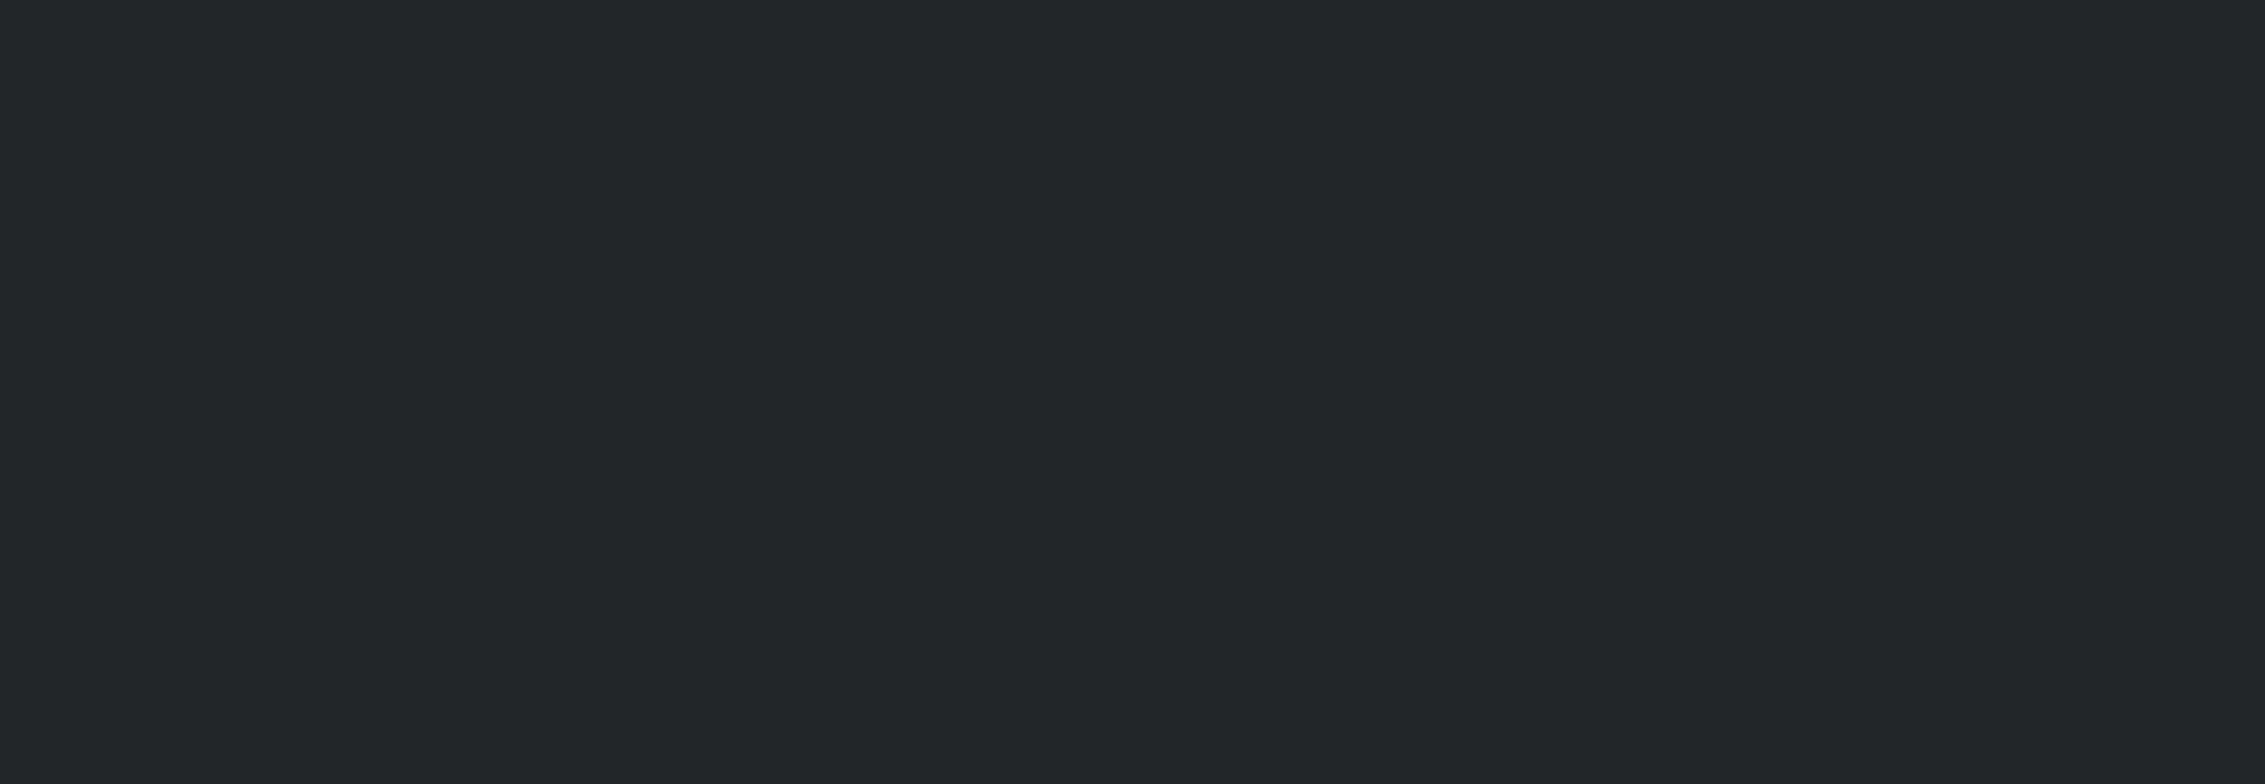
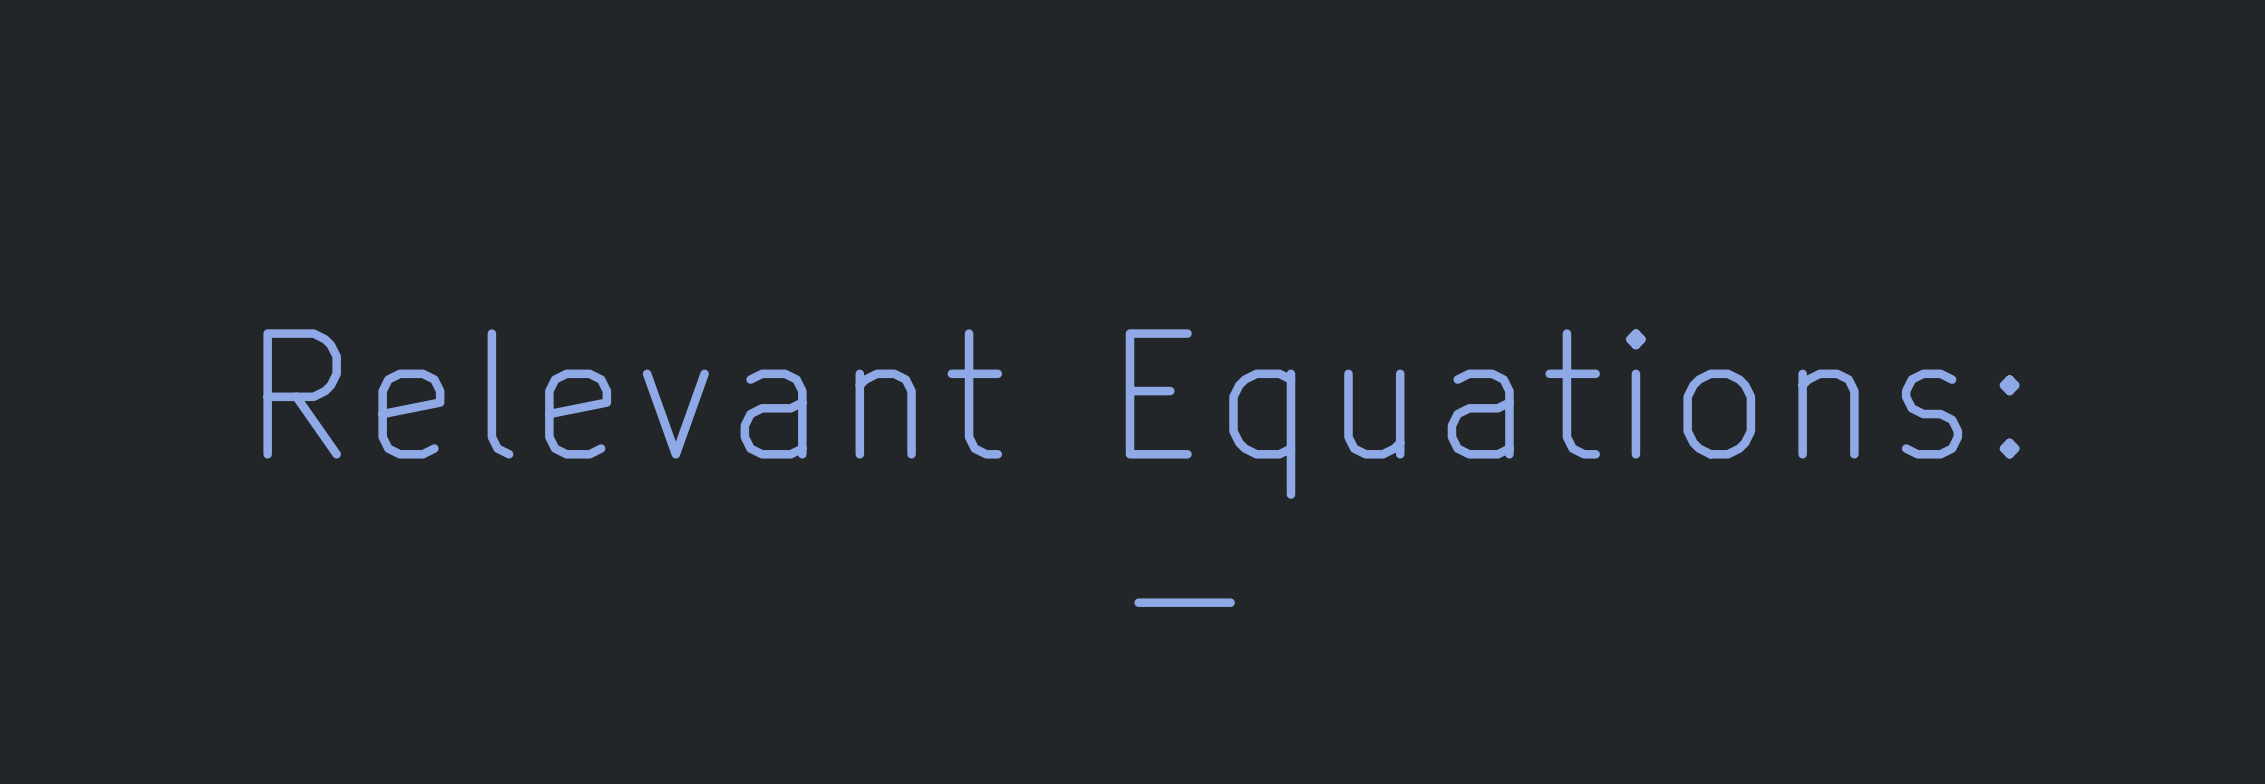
text: none -> Relevant Equations: (1141, 414)
text: none -> - (1184, 602)

